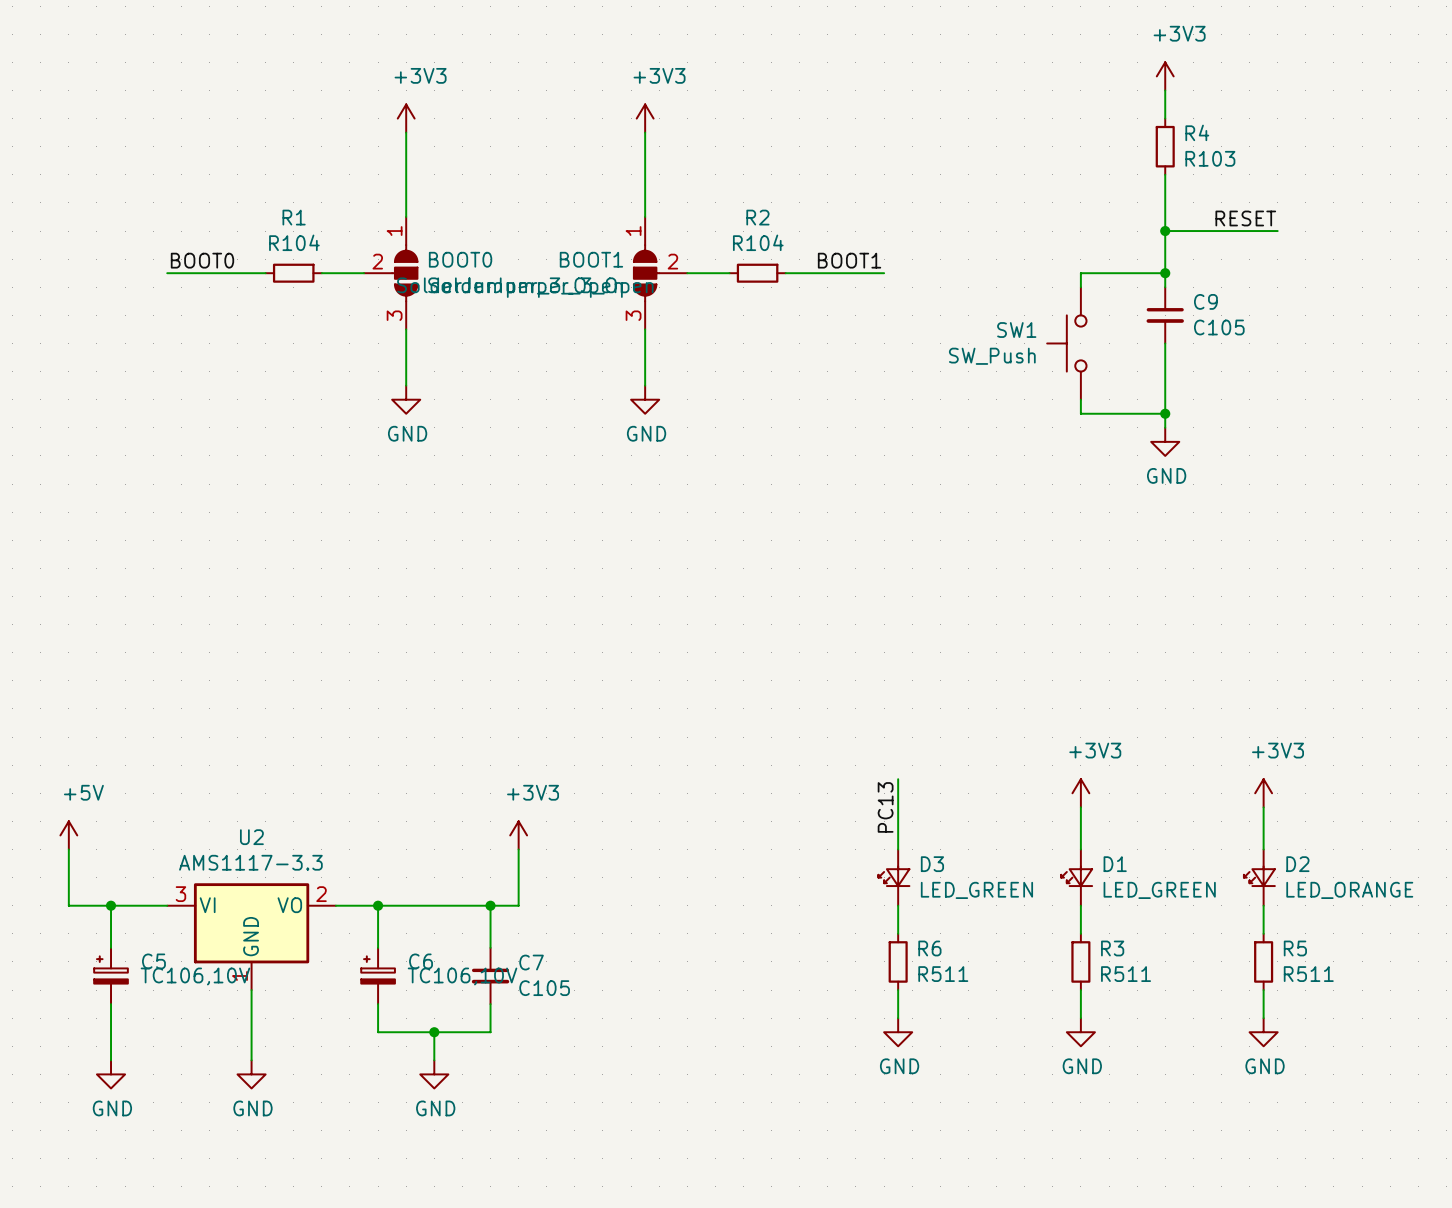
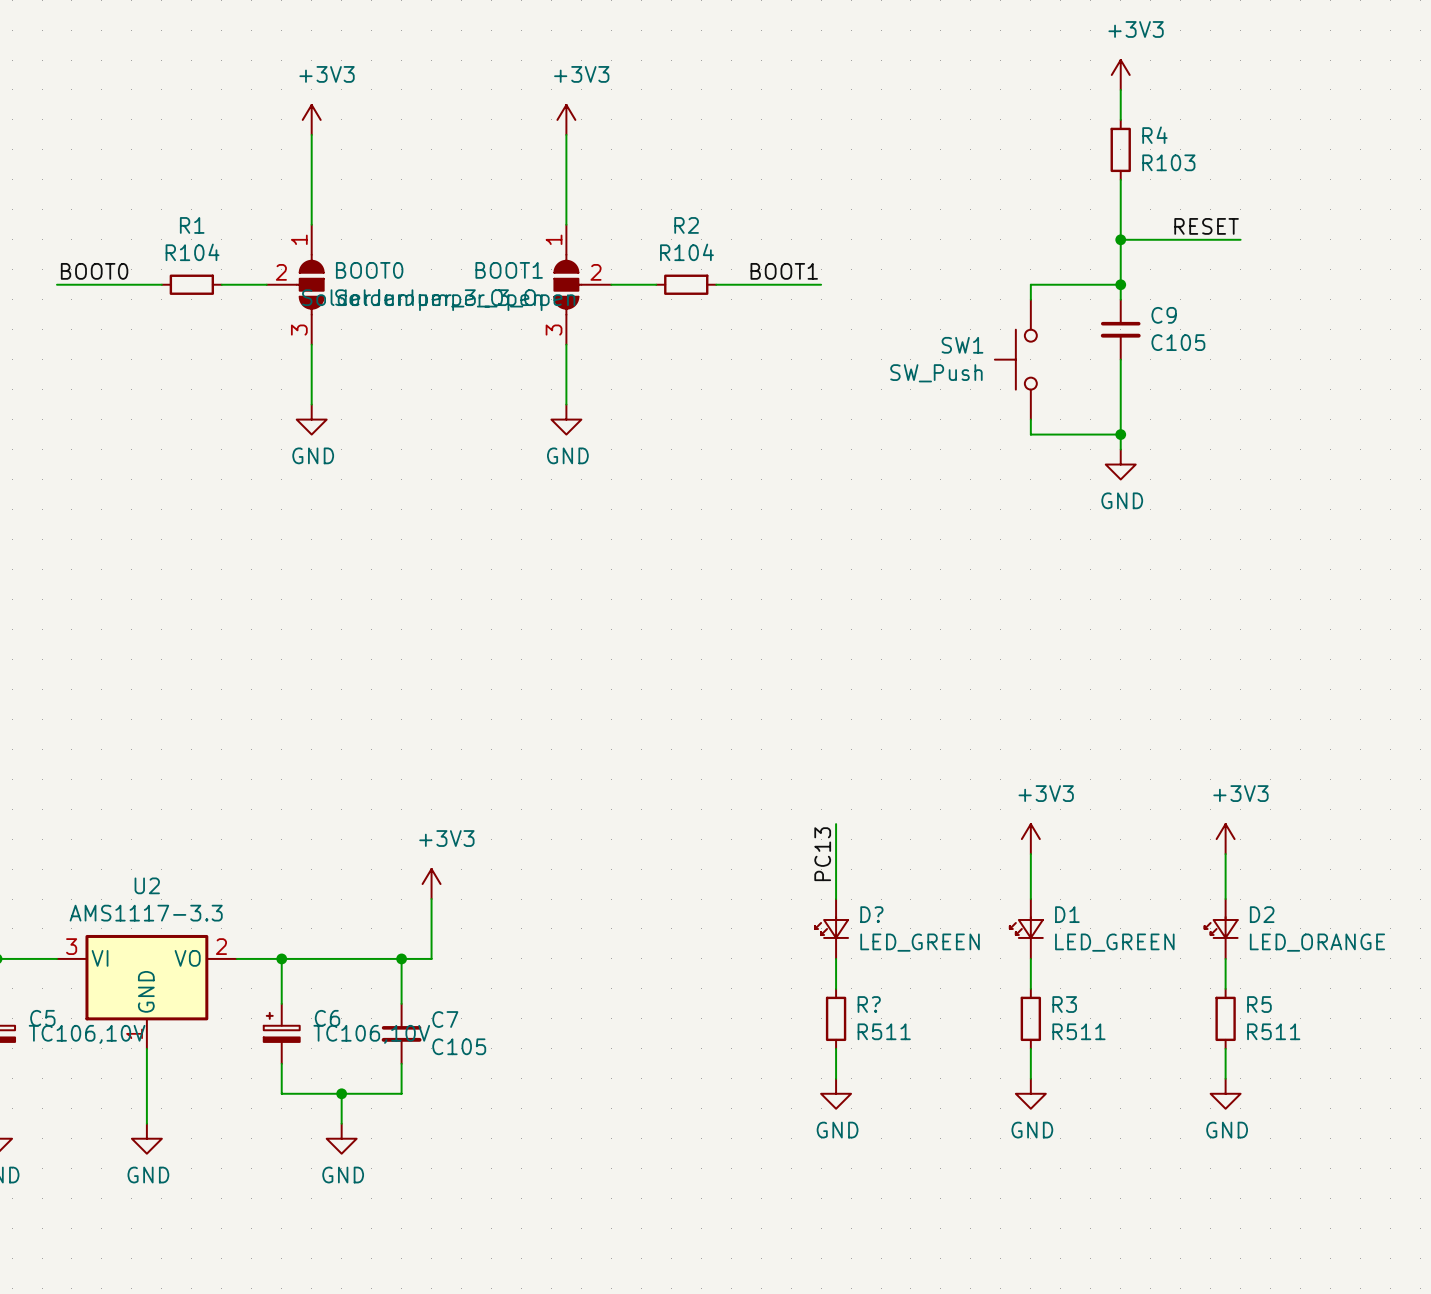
D3 name: D3 (932, 864) -> D? (871, 914)
R6 name: R6 (929, 948) -> R? (869, 1004)

